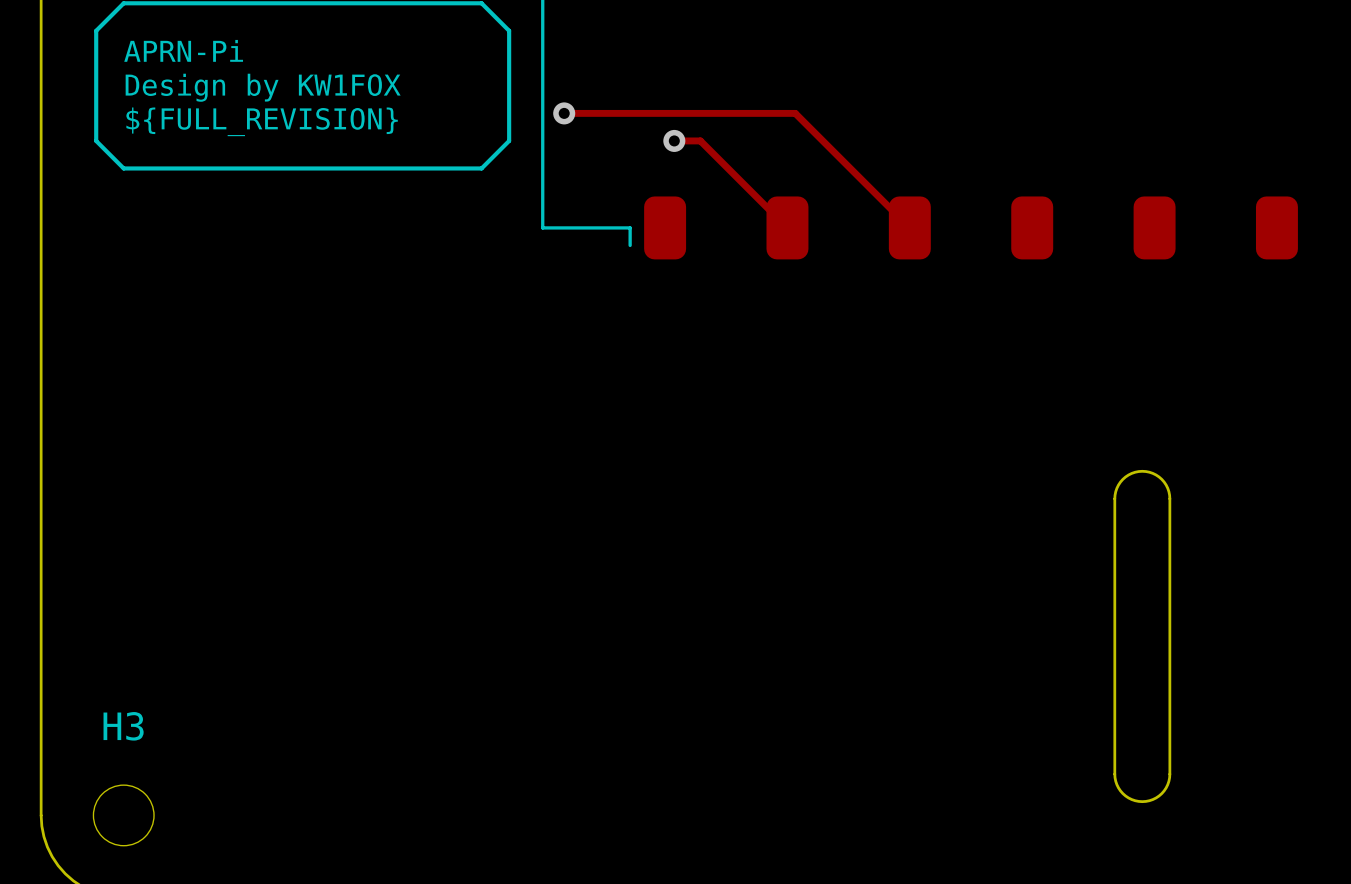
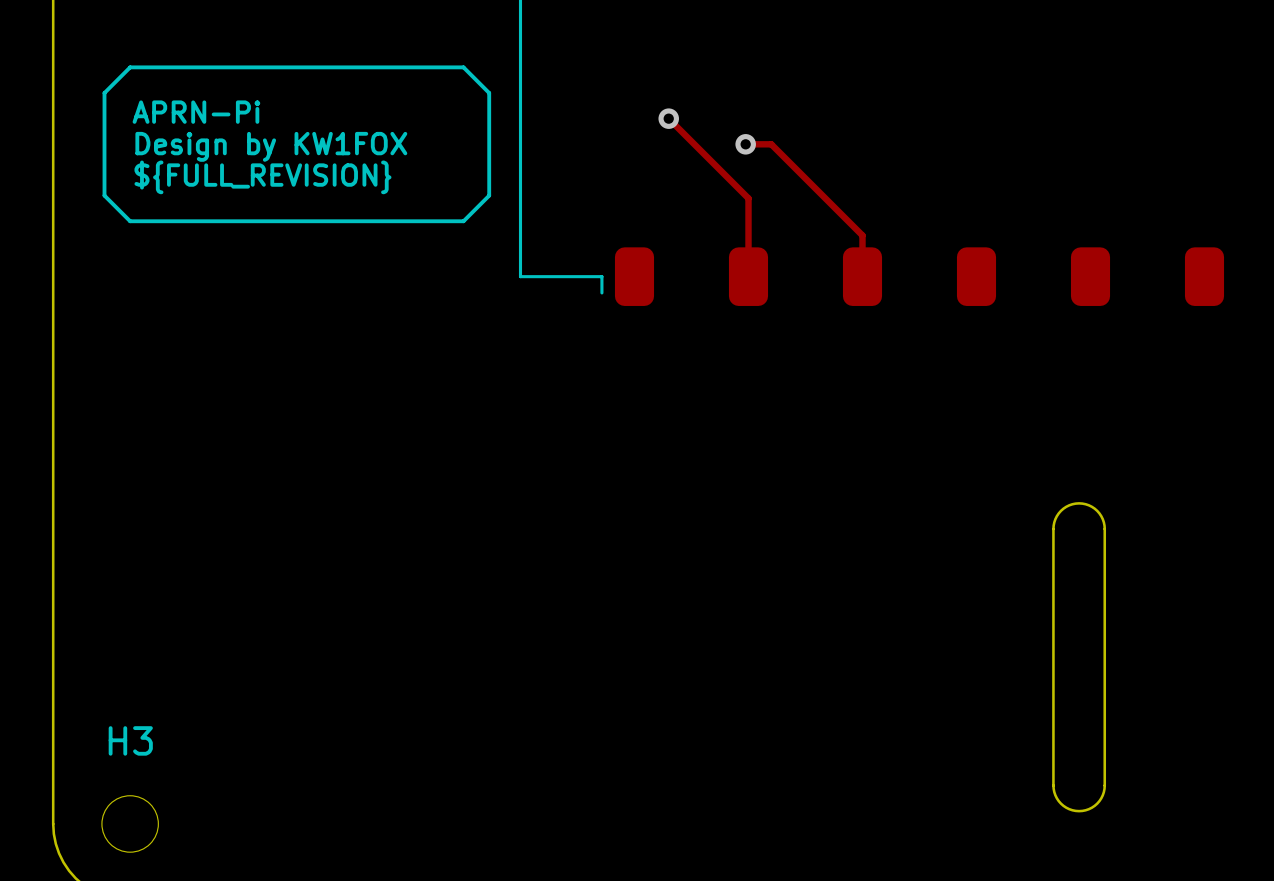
via: none -> (668, 118)
via: none -> (745, 144)
track: (564, 113) (795, 113) (909, 227) -> (745, 144) (771, 144) (862, 235) (862, 276)
via: (564, 113) -> none
track: (674, 140) (700, 140) (787, 227) -> (668, 118) (748, 198) (748, 276)
via: (674, 140) -> none

